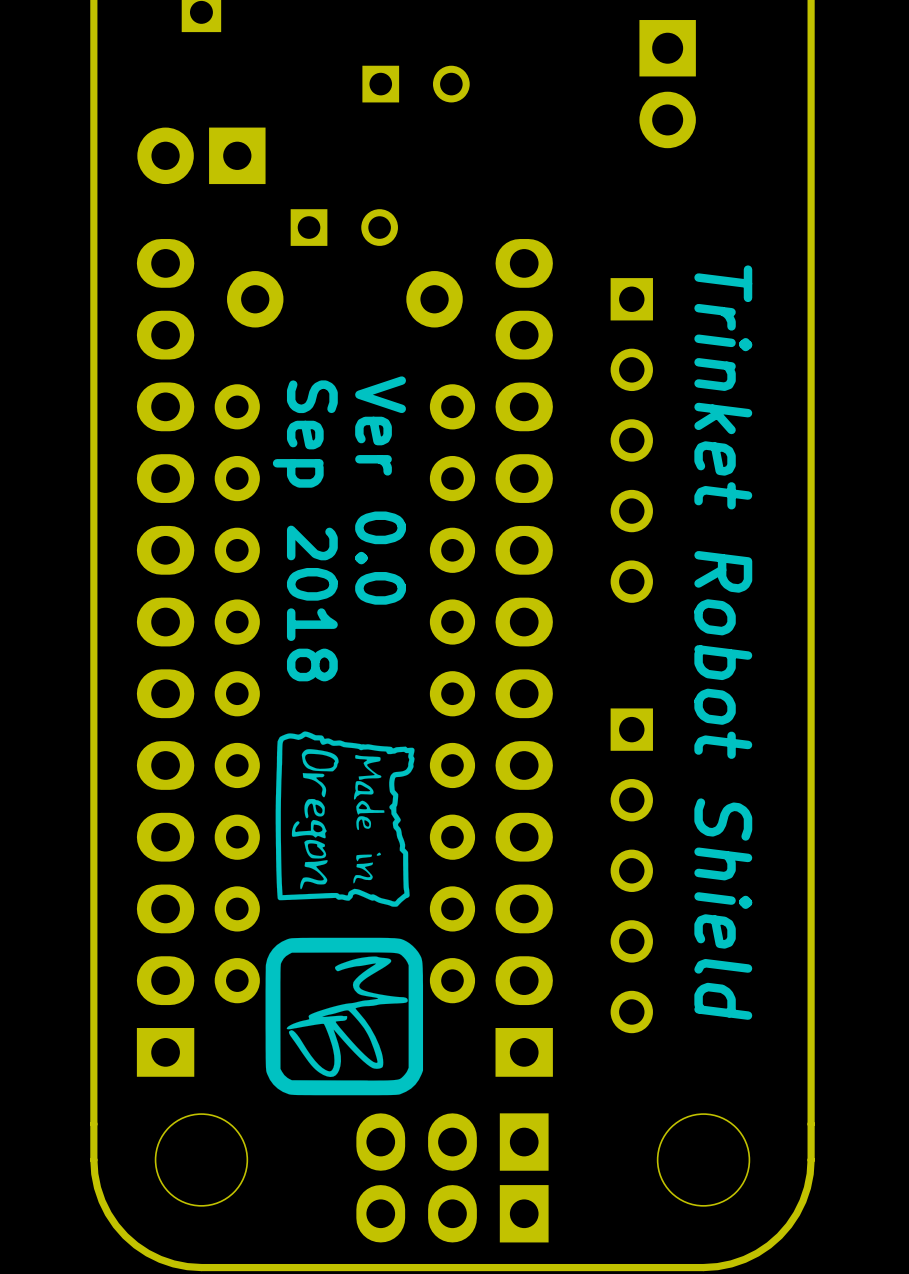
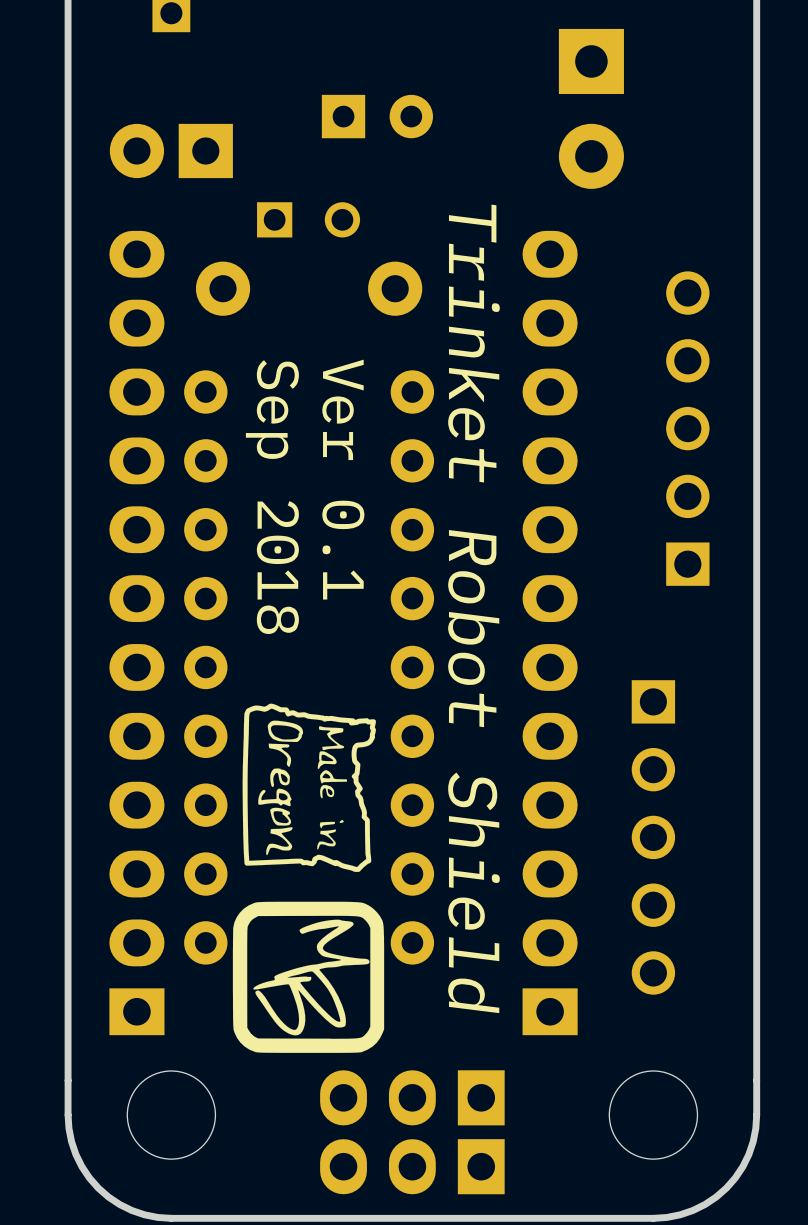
part: (416, 84) -> none
part: (667, 84) -> none
part: none -> (591, 108)
part: none -> (377, 116)
part: (631, 440) -> none
part: none -> (687, 428)
text: Ver 0.0 (380, 490) -> Ver 0.1 (343, 479)
text position: Trinket Robot Shield (723, 642) -> Trinket Robot Shield (473, 608)
part position: (524, 657) -> (550, 633)
part: (631, 870) -> none
part: none -> (653, 837)

